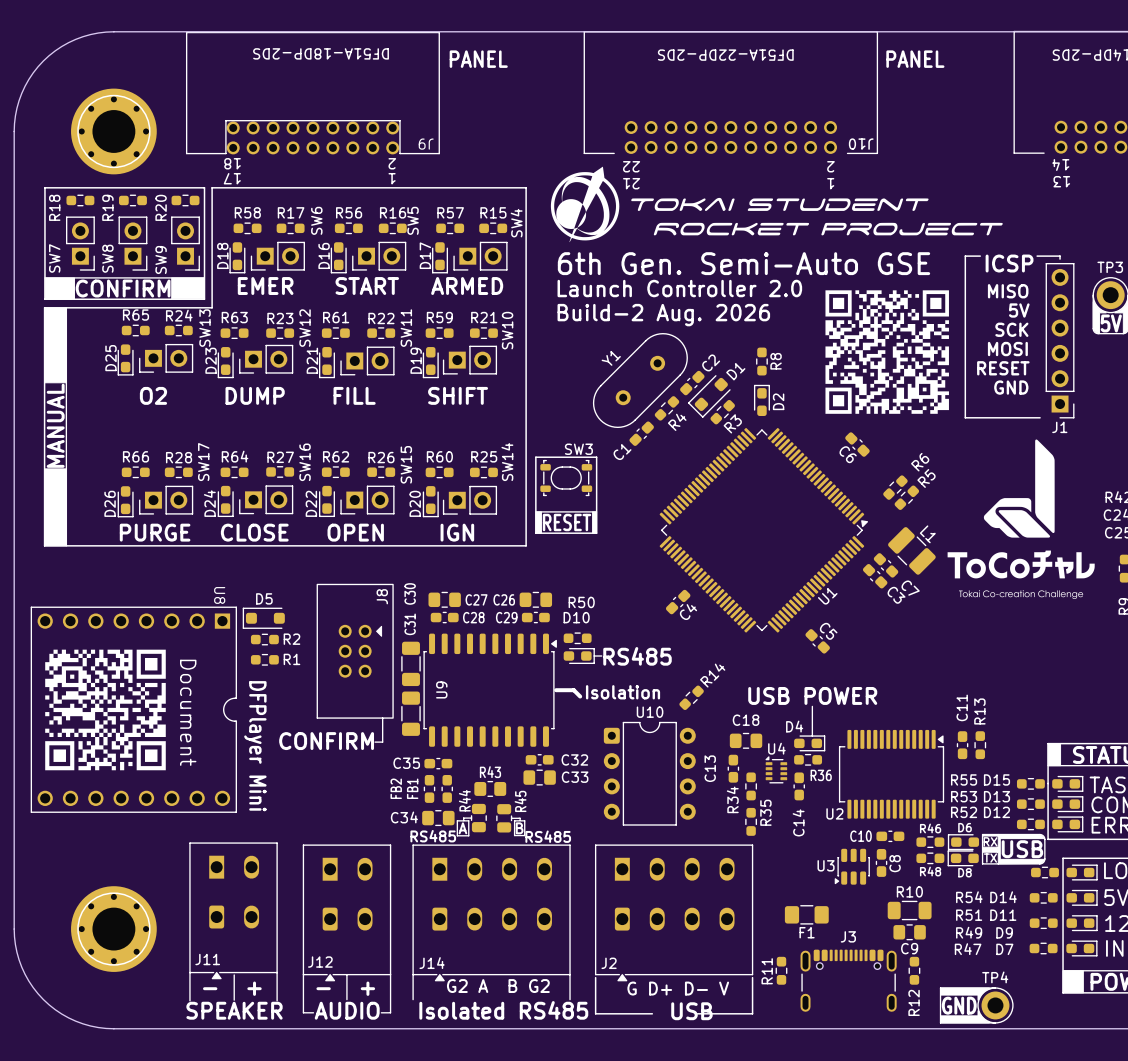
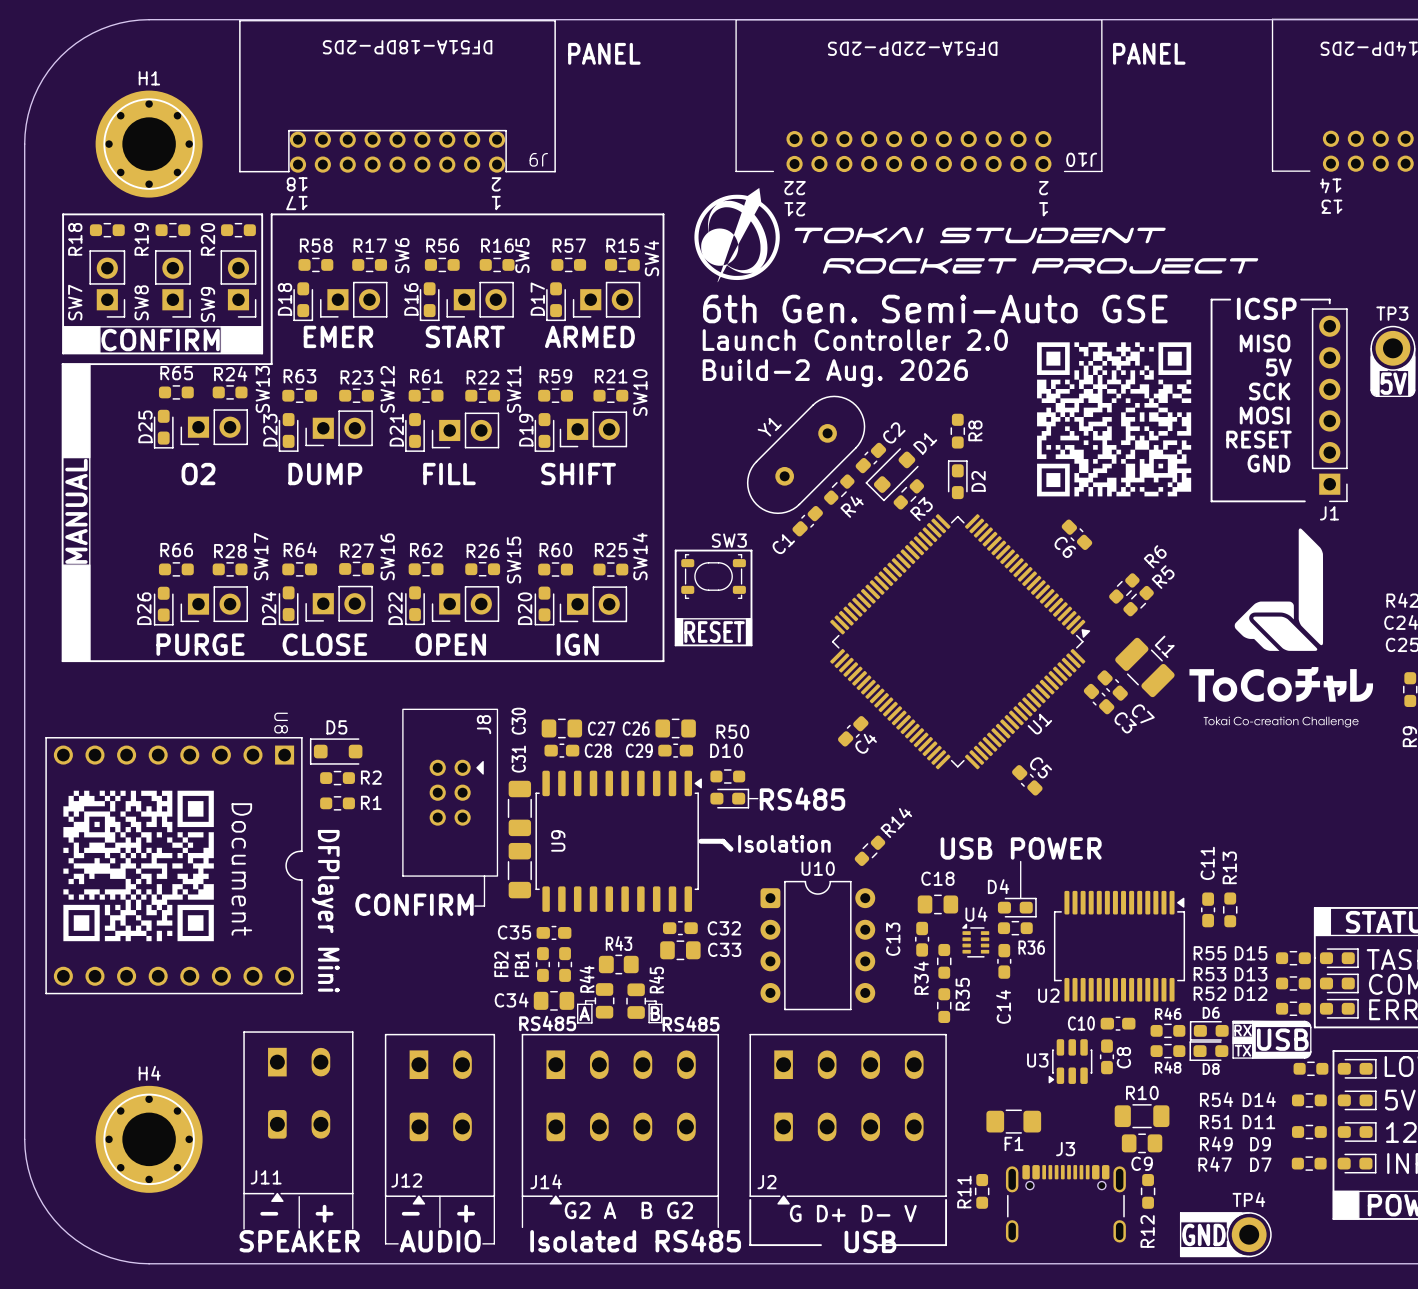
H1 name: none -> H1 (149, 78)
H4 name: none -> H4 (149, 1073)

